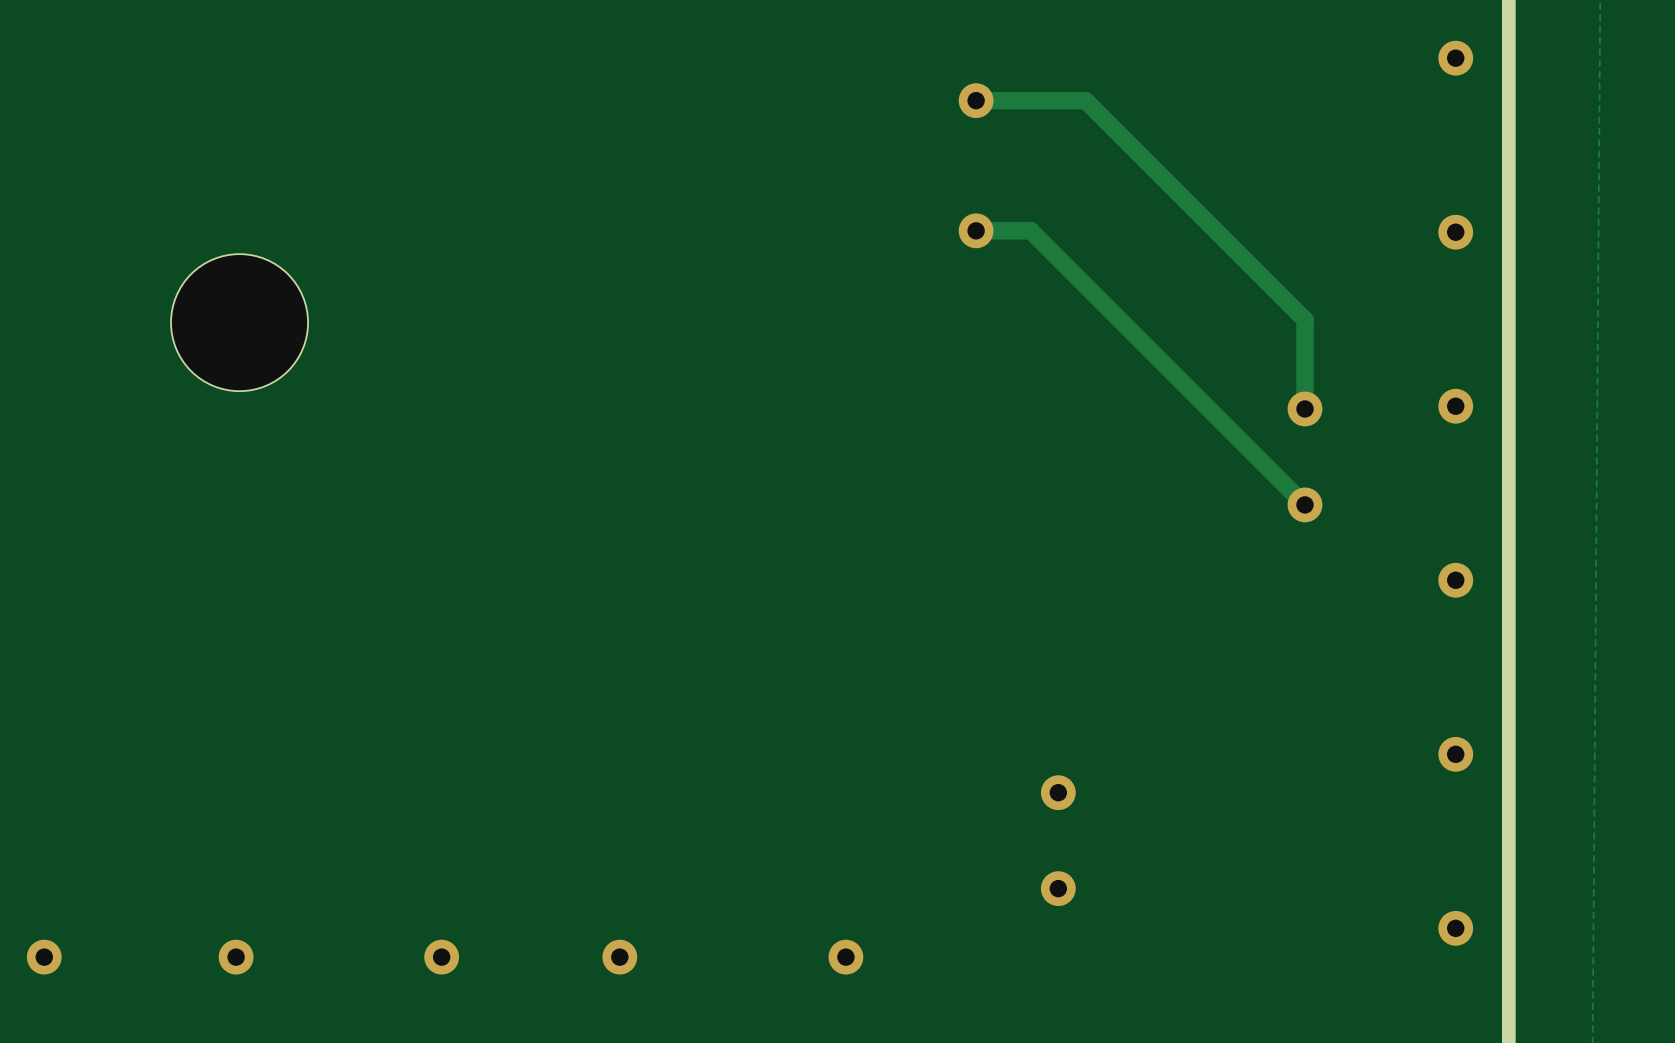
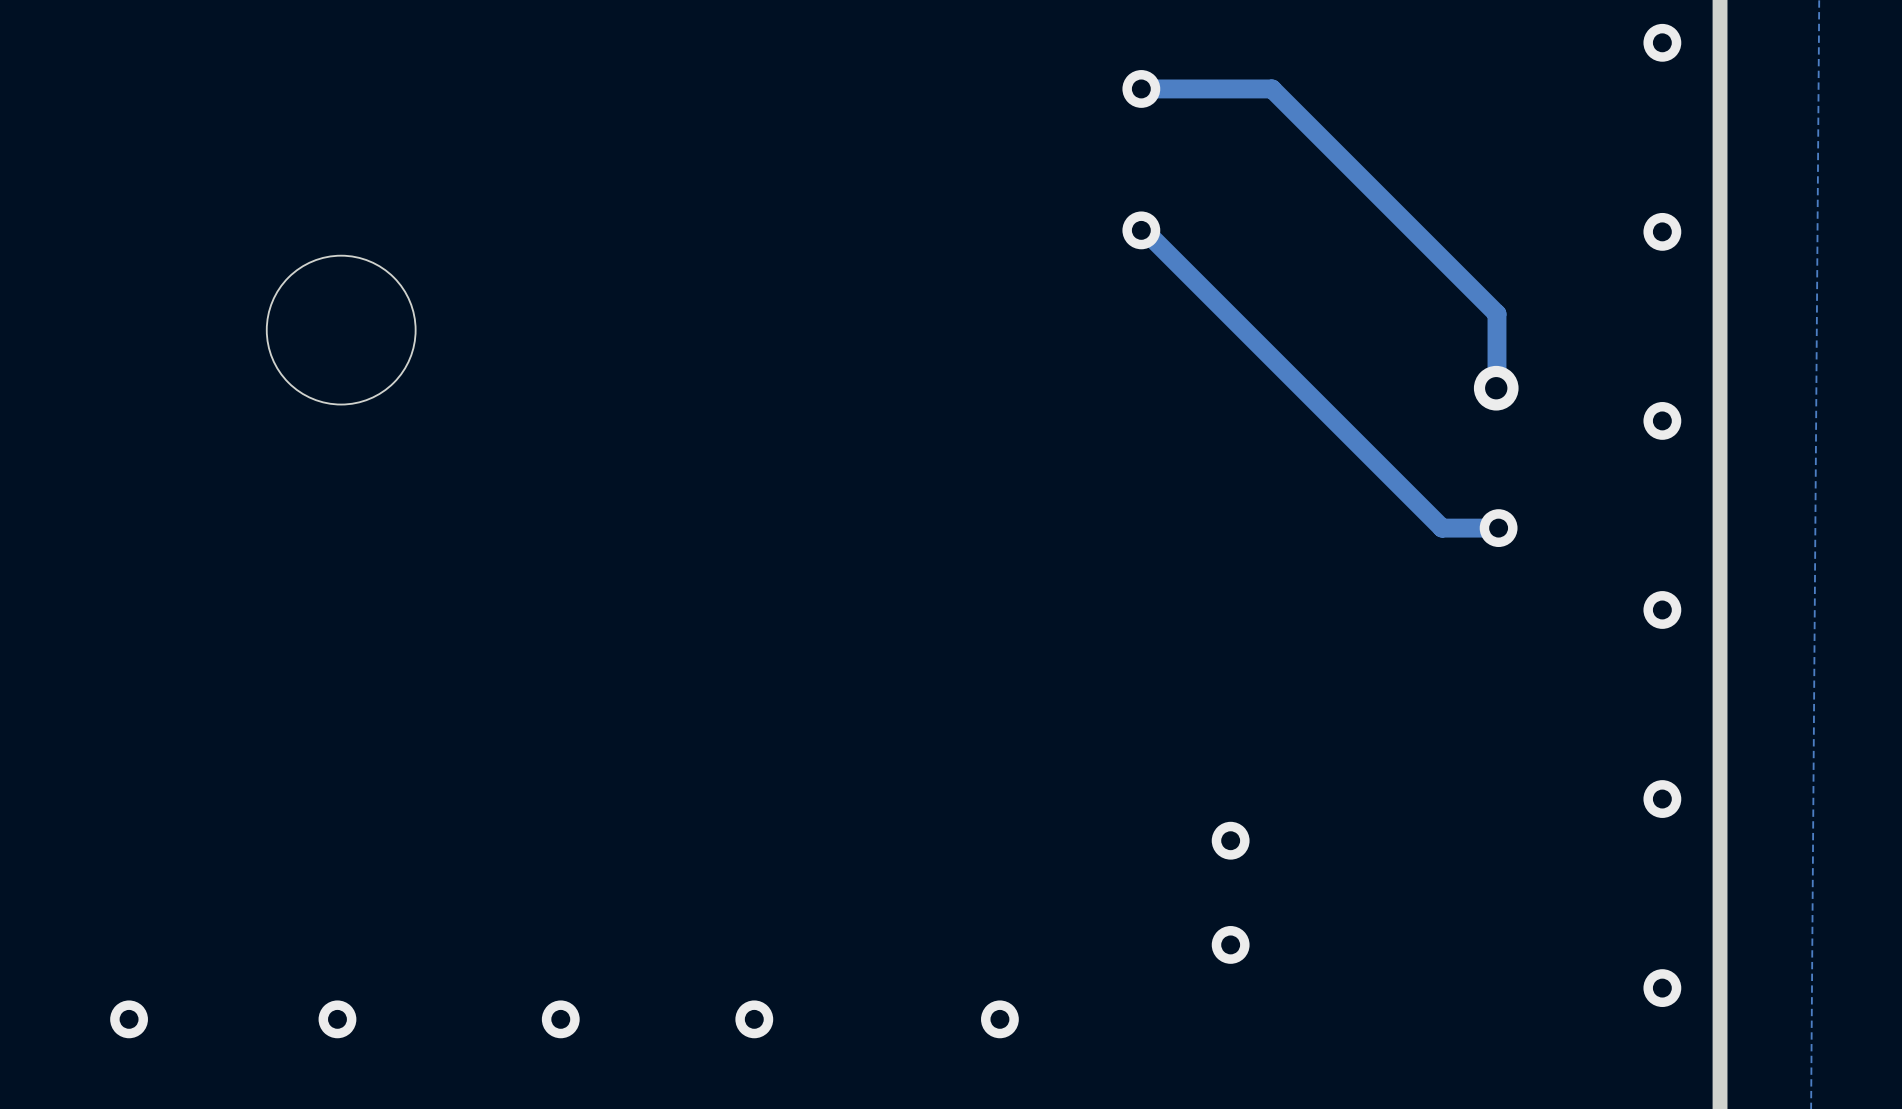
track: (1085, 100) (1304, 319) (1304, 408) -> (1260, 88) (1272, 88) (1496, 313) (1496, 388)
track: (978, 230) (1030, 230) (1304, 504) -> (1144, 230) (1442, 528) (1498, 528)
via position: (1304, 408) -> (1496, 388)

